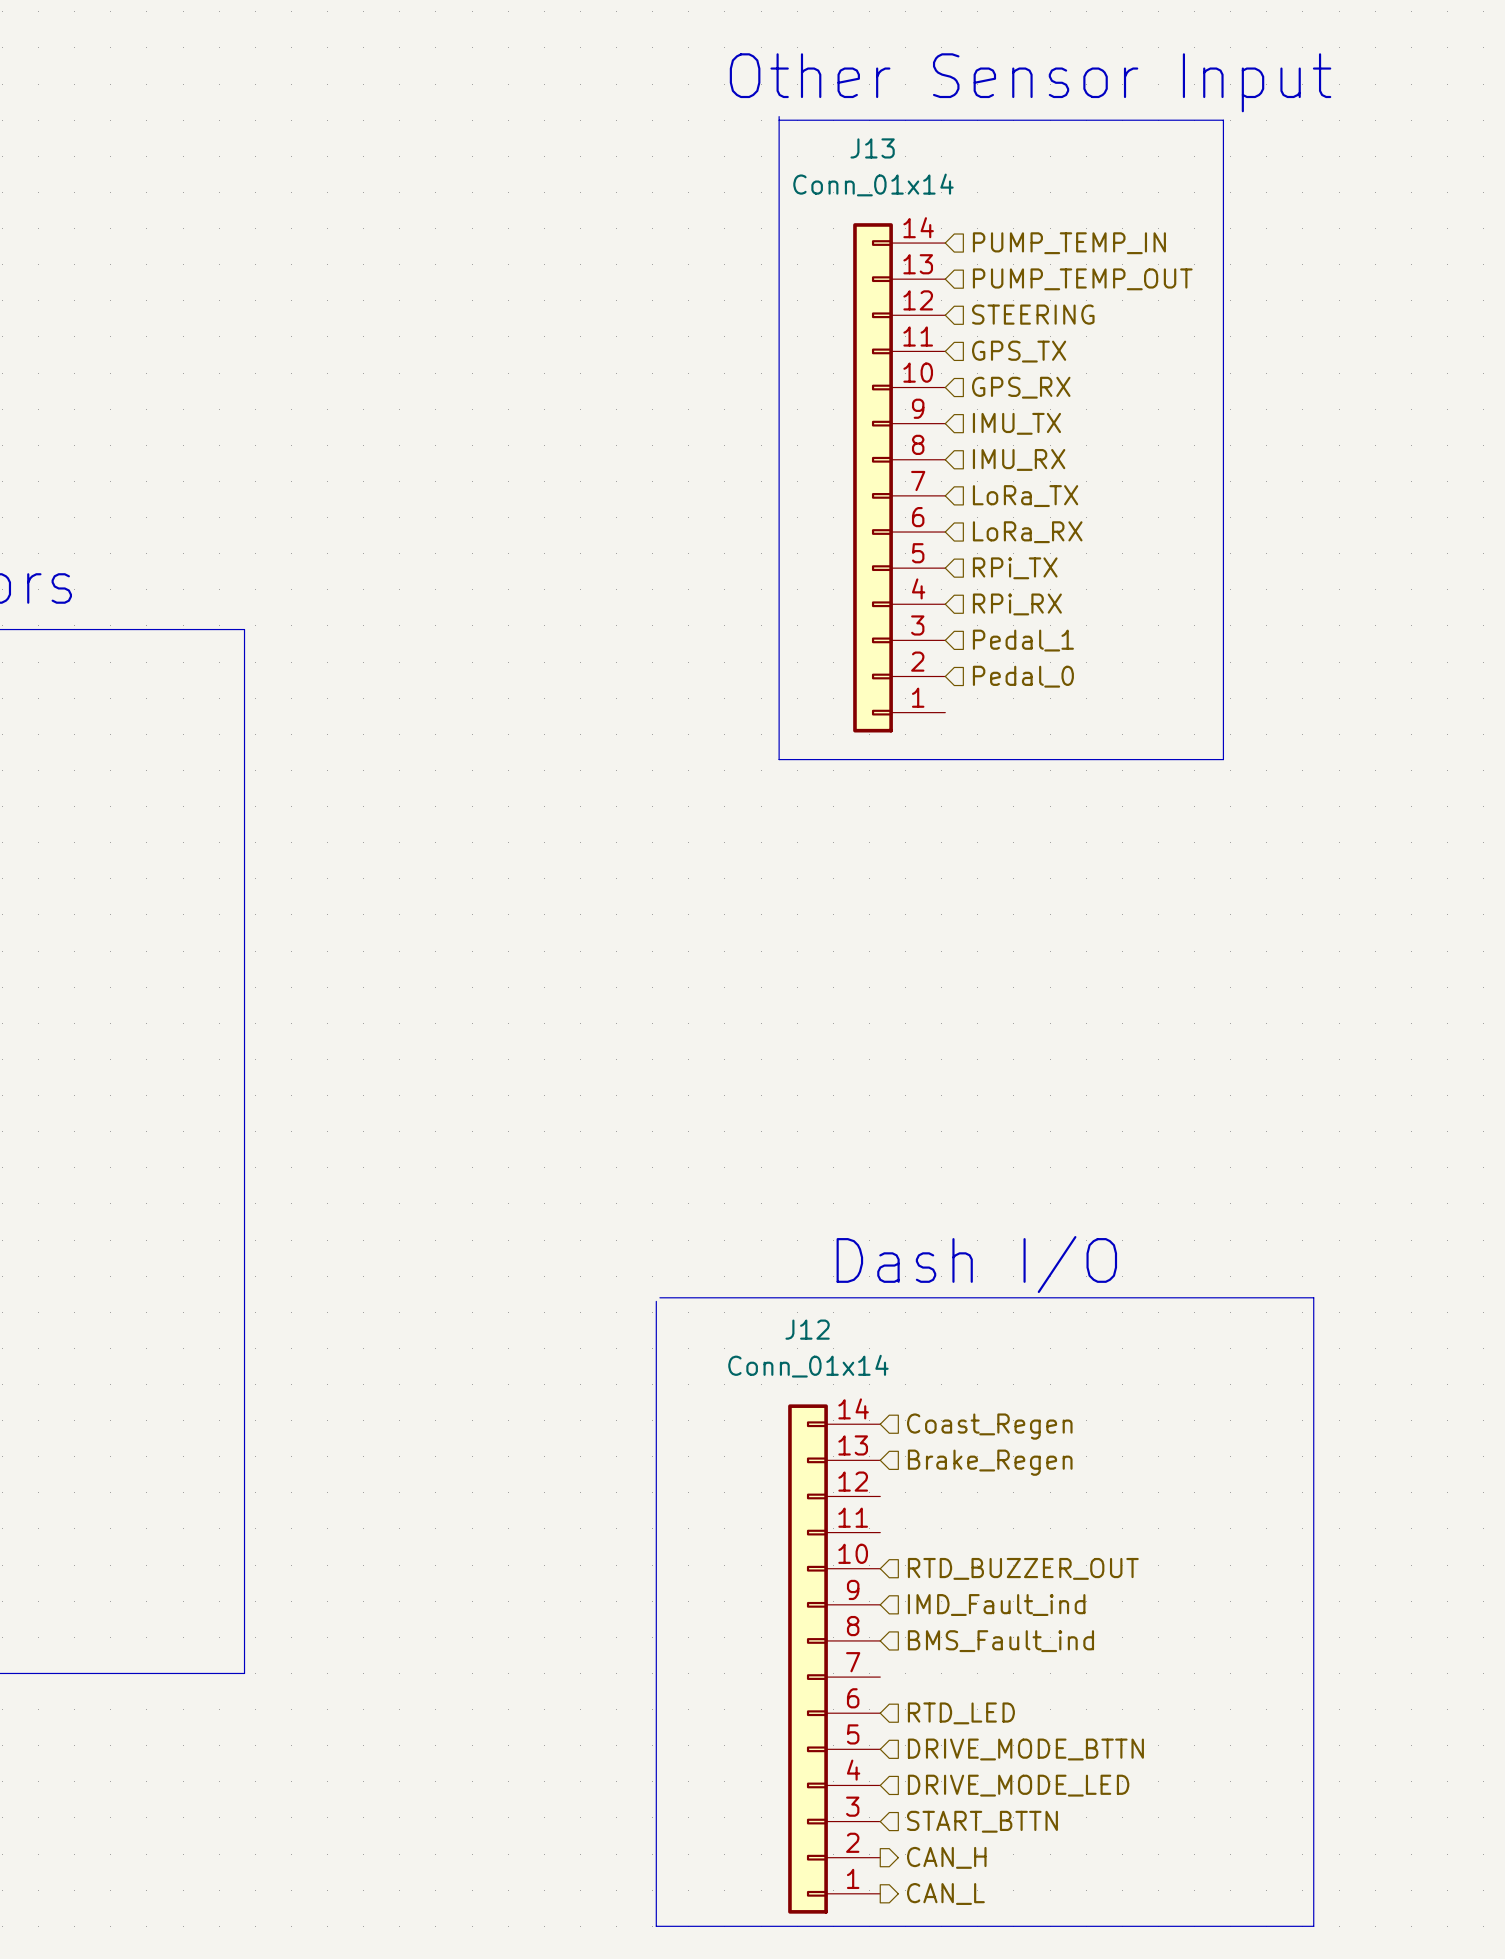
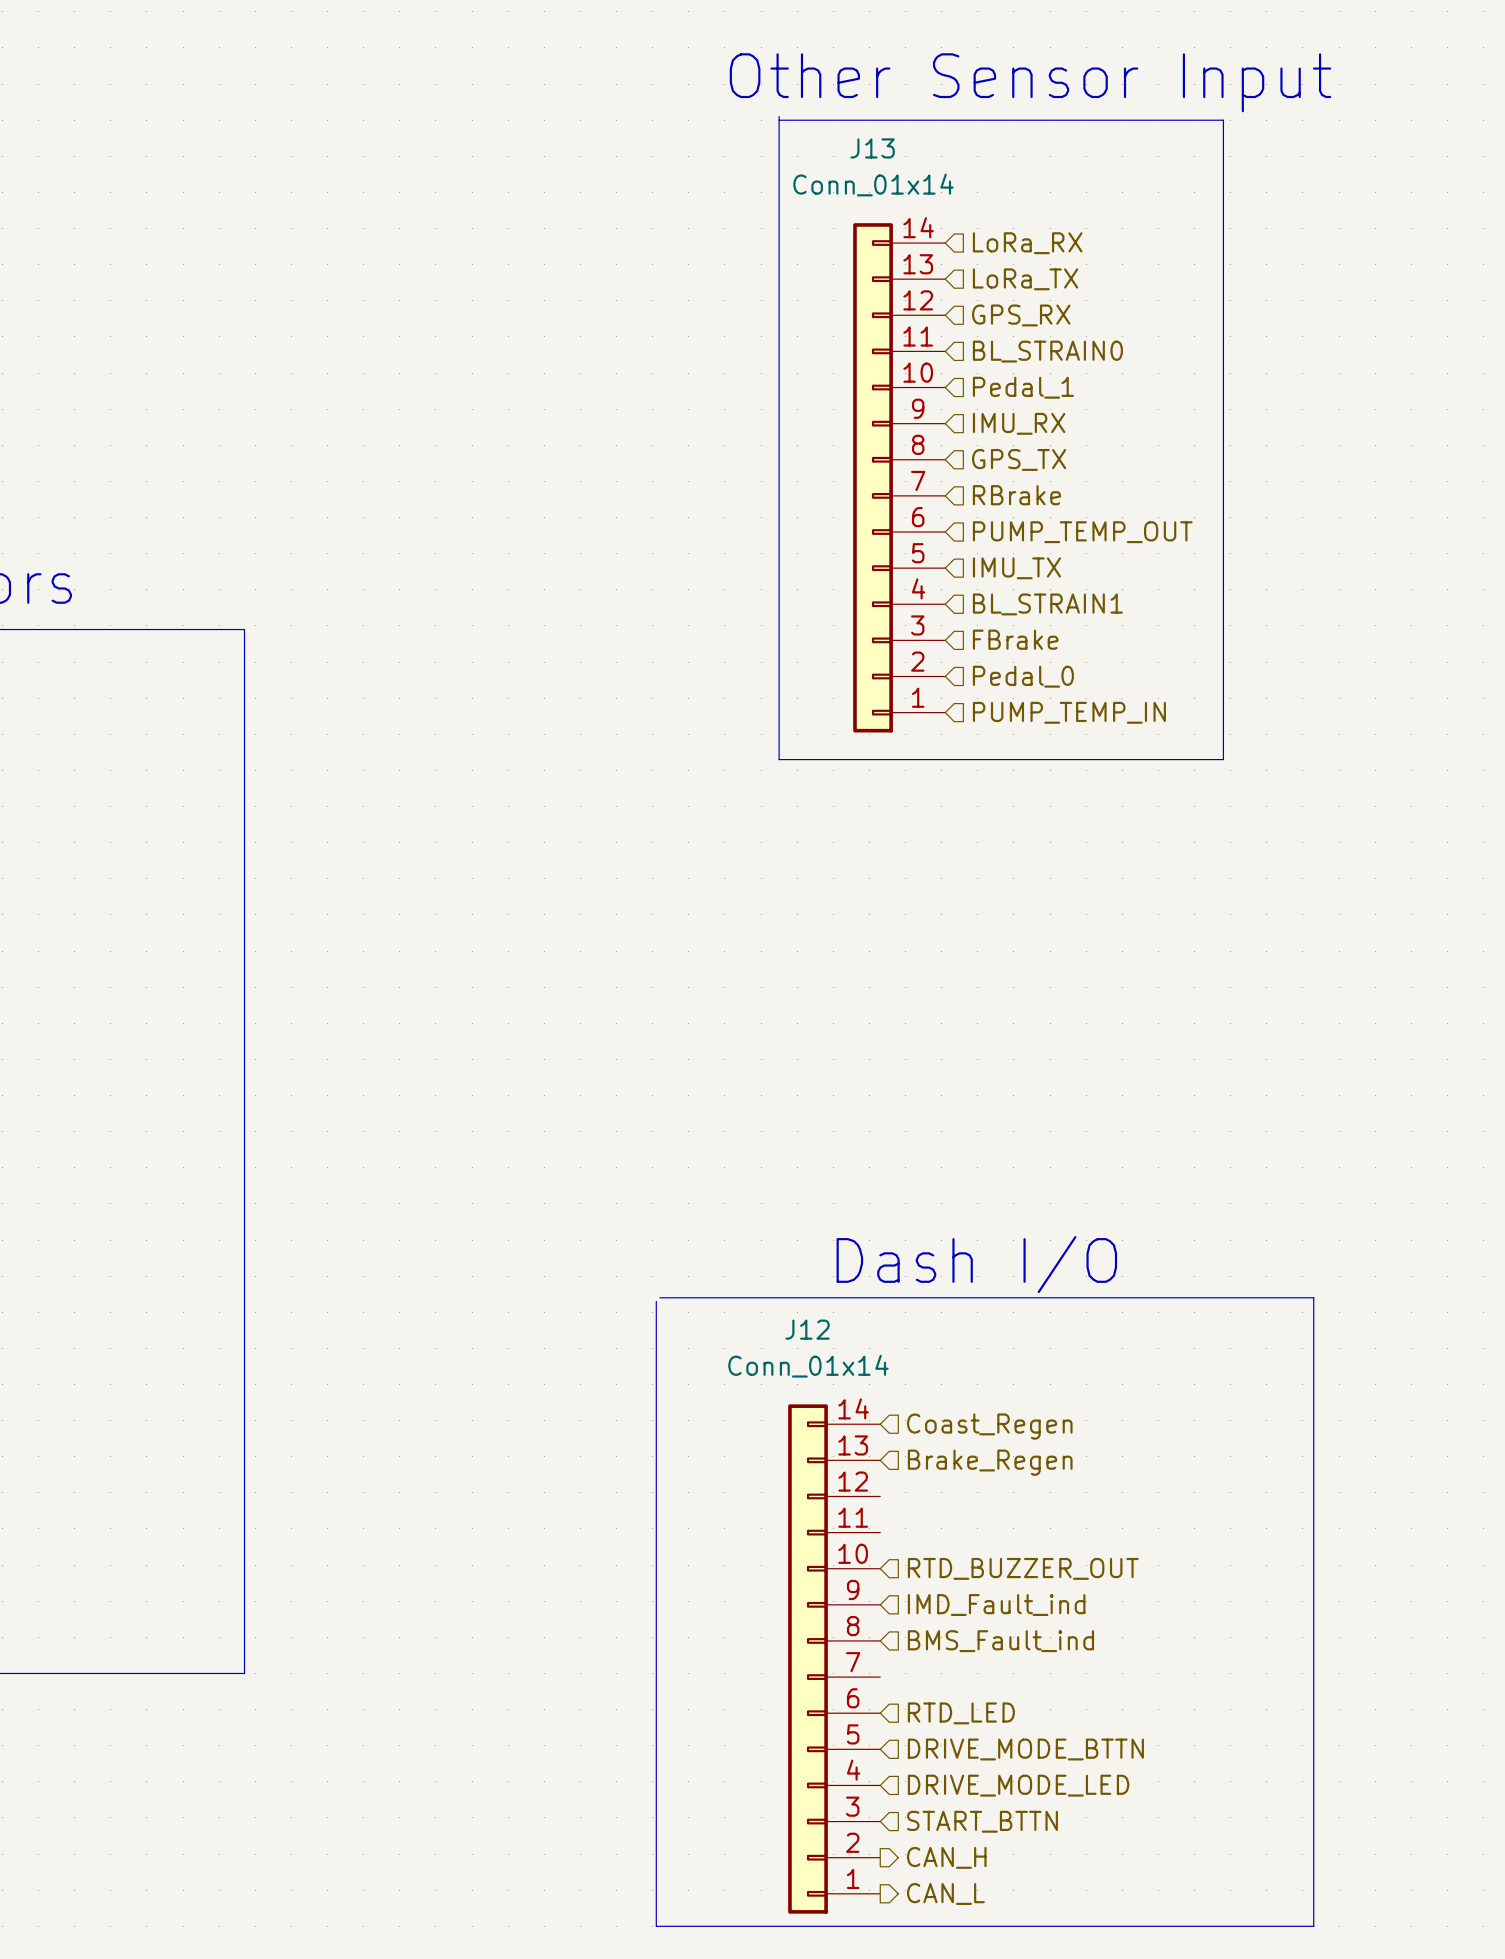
hierarchical label: PUMP_TEMP_IN (1069, 243) -> LoRa_RX (1027, 243)
hierarchical label: PUMP_TEMP_OUT (1082, 279) -> LoRa_TX (1025, 279)
hierarchical label: STEERING (1033, 314) -> GPS_RX (1021, 315)
hierarchical label: GPS_TX (1019, 351) -> BL_STRAIN0 (1047, 351)
hierarchical label: GPS_RX (1021, 387) -> Pedal_1 (1023, 387)
hierarchical label: IMU_TX (1016, 423) -> IMU_RX (1019, 423)
hierarchical label: IMU_RX (1019, 459) -> GPS_TX (1019, 459)
hierarchical label: LoRa_TX (1025, 496) -> RBrake (1016, 495)
hierarchical label: LoRa_RX (1027, 532) -> PUMP_TEMP_OUT (1082, 532)
hierarchical label: RPi_TX (1015, 568) -> IMU_TX (1016, 568)
hierarchical label: RPi_RX (1017, 604) -> BL_STRAIN1 (1047, 604)
hierarchical label: Pedal_1 (1023, 640) -> FBrake (1015, 639)
hierarchical label: none -> PUMP_TEMP_IN (1069, 712)

